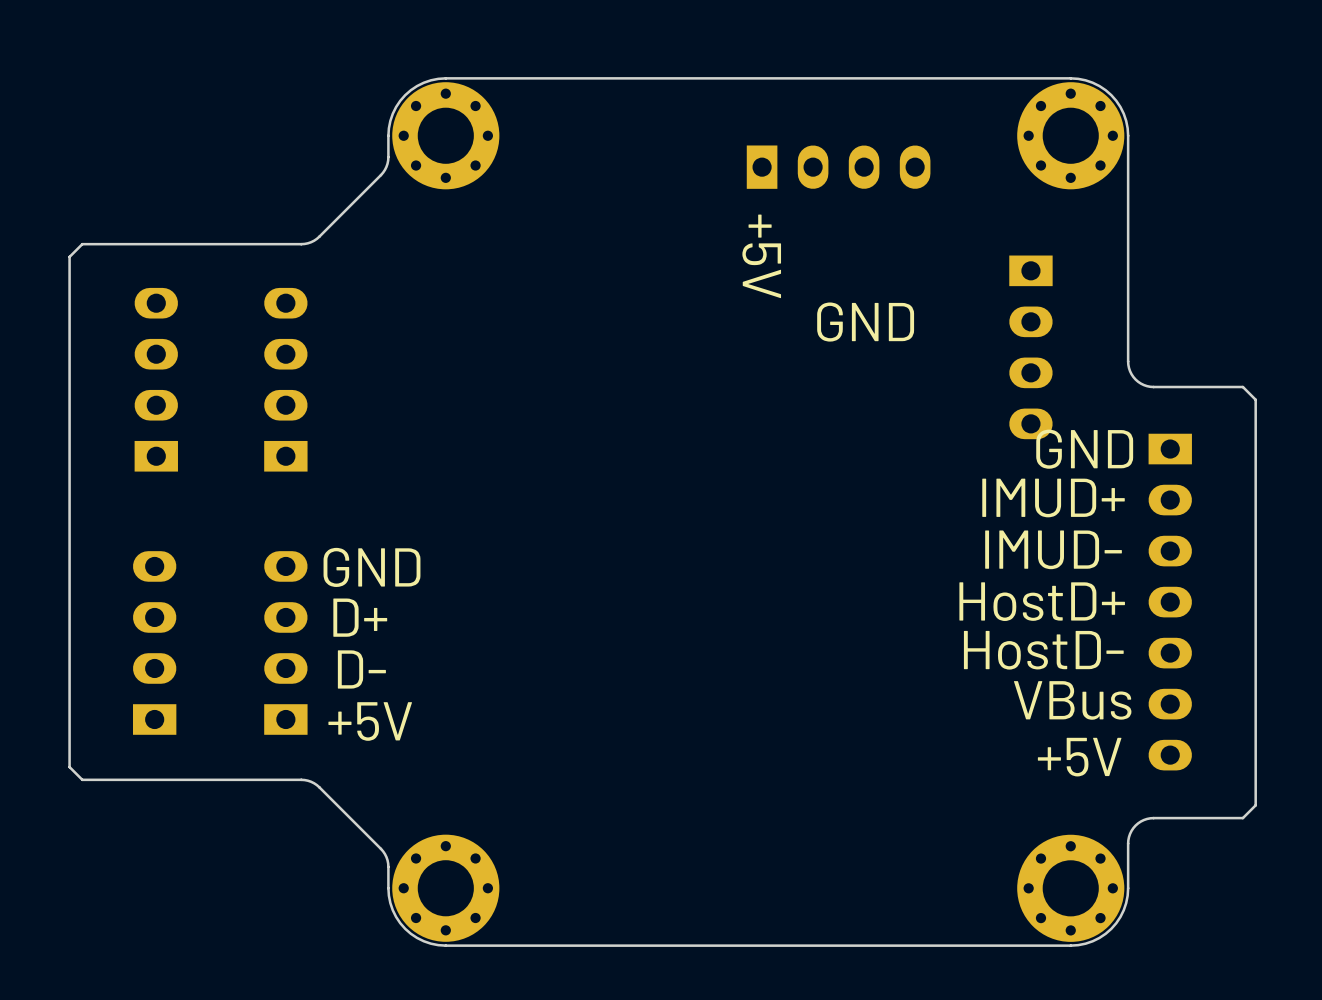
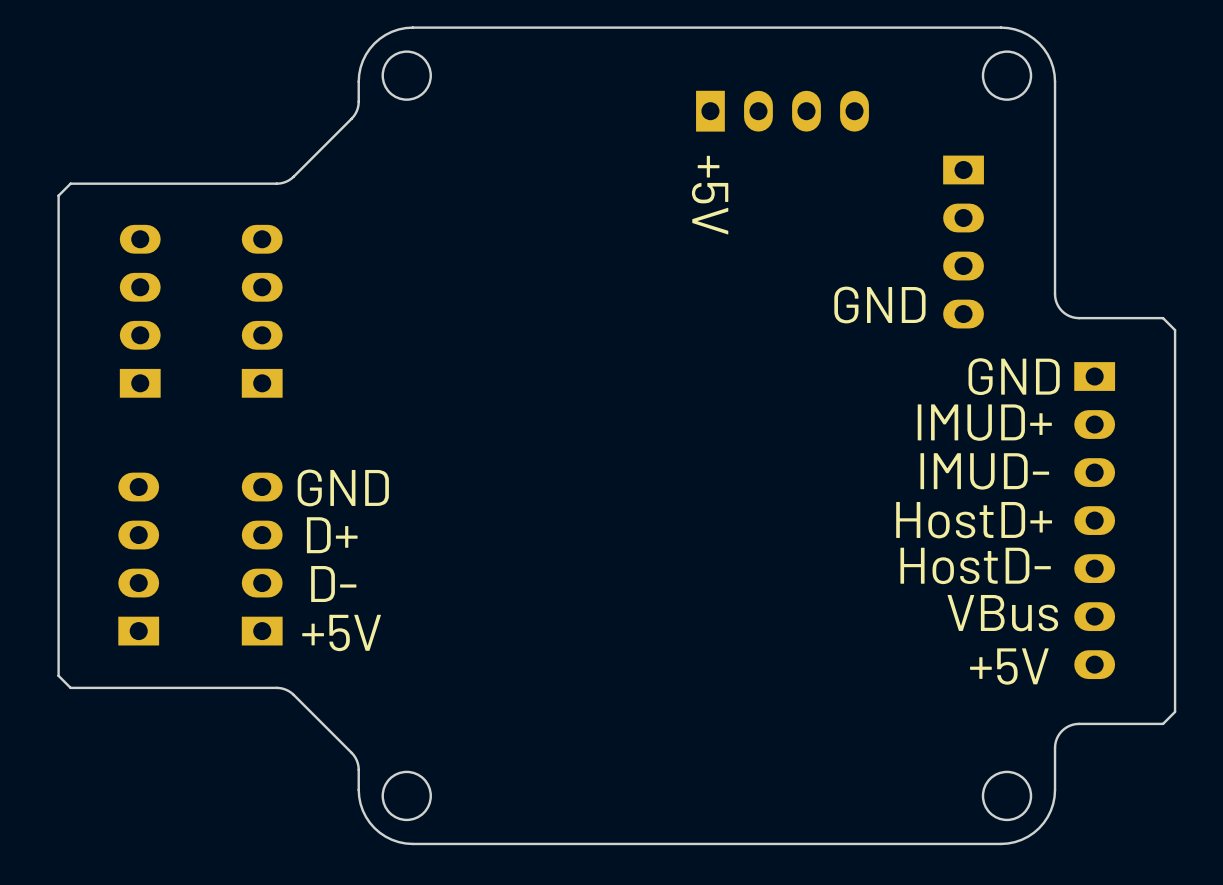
round board edge: none -> [381, 50, 432, 101]
round board edge: none -> [981, 50, 1033, 101]
part: (445, 135) -> none
part: (1070, 135) -> none
text position: GND (865, 322) -> GND (879, 305)
part position: (1030, 347) -> (963, 242)
round board edge: none -> [381, 770, 432, 822]
round board edge: none -> [981, 770, 1033, 822]
part: (445, 888) -> none
part: (1070, 888) -> none

